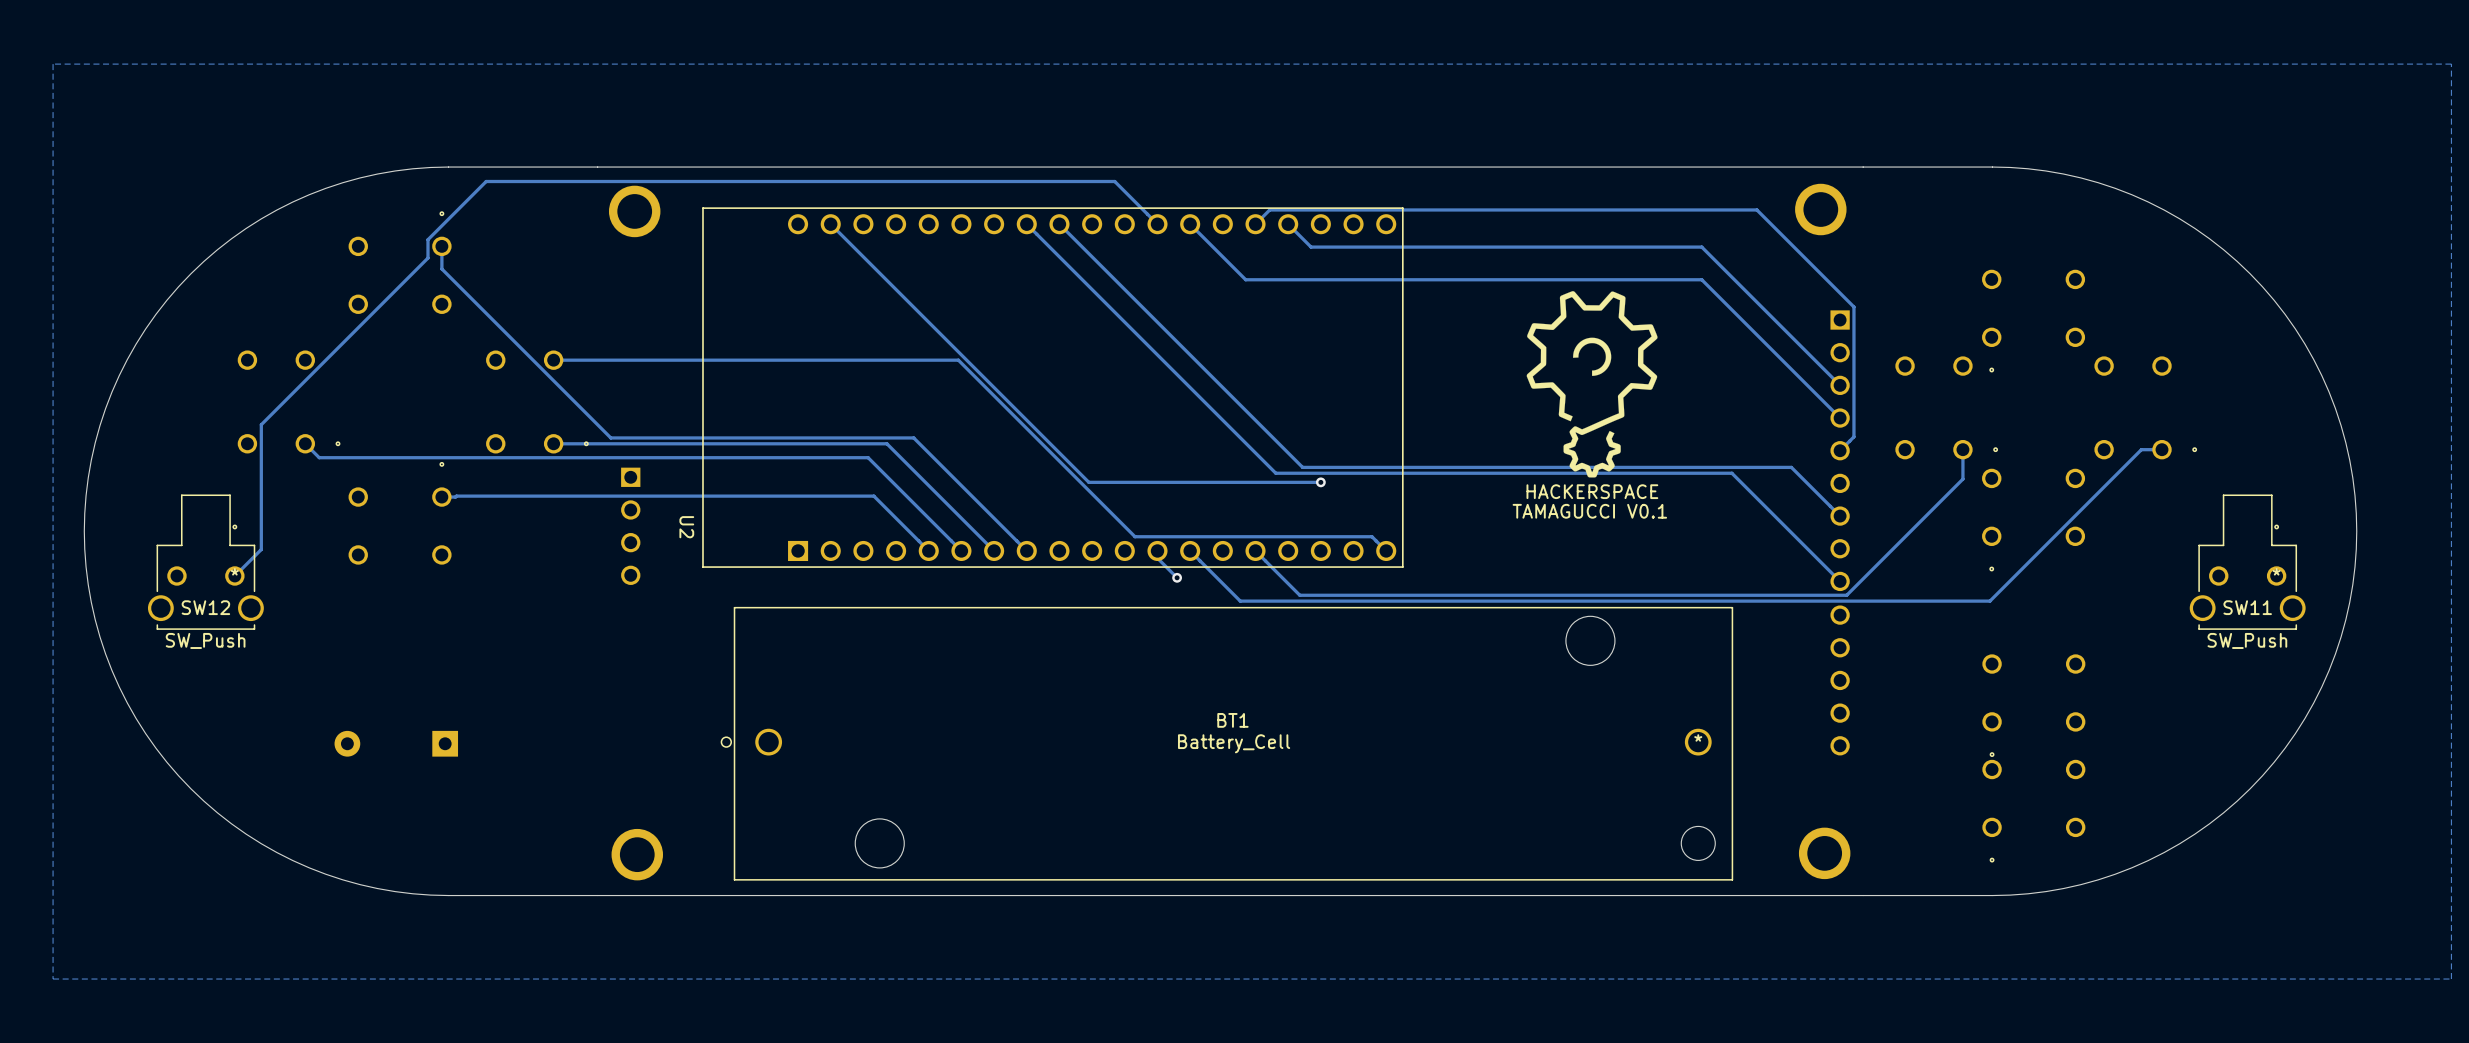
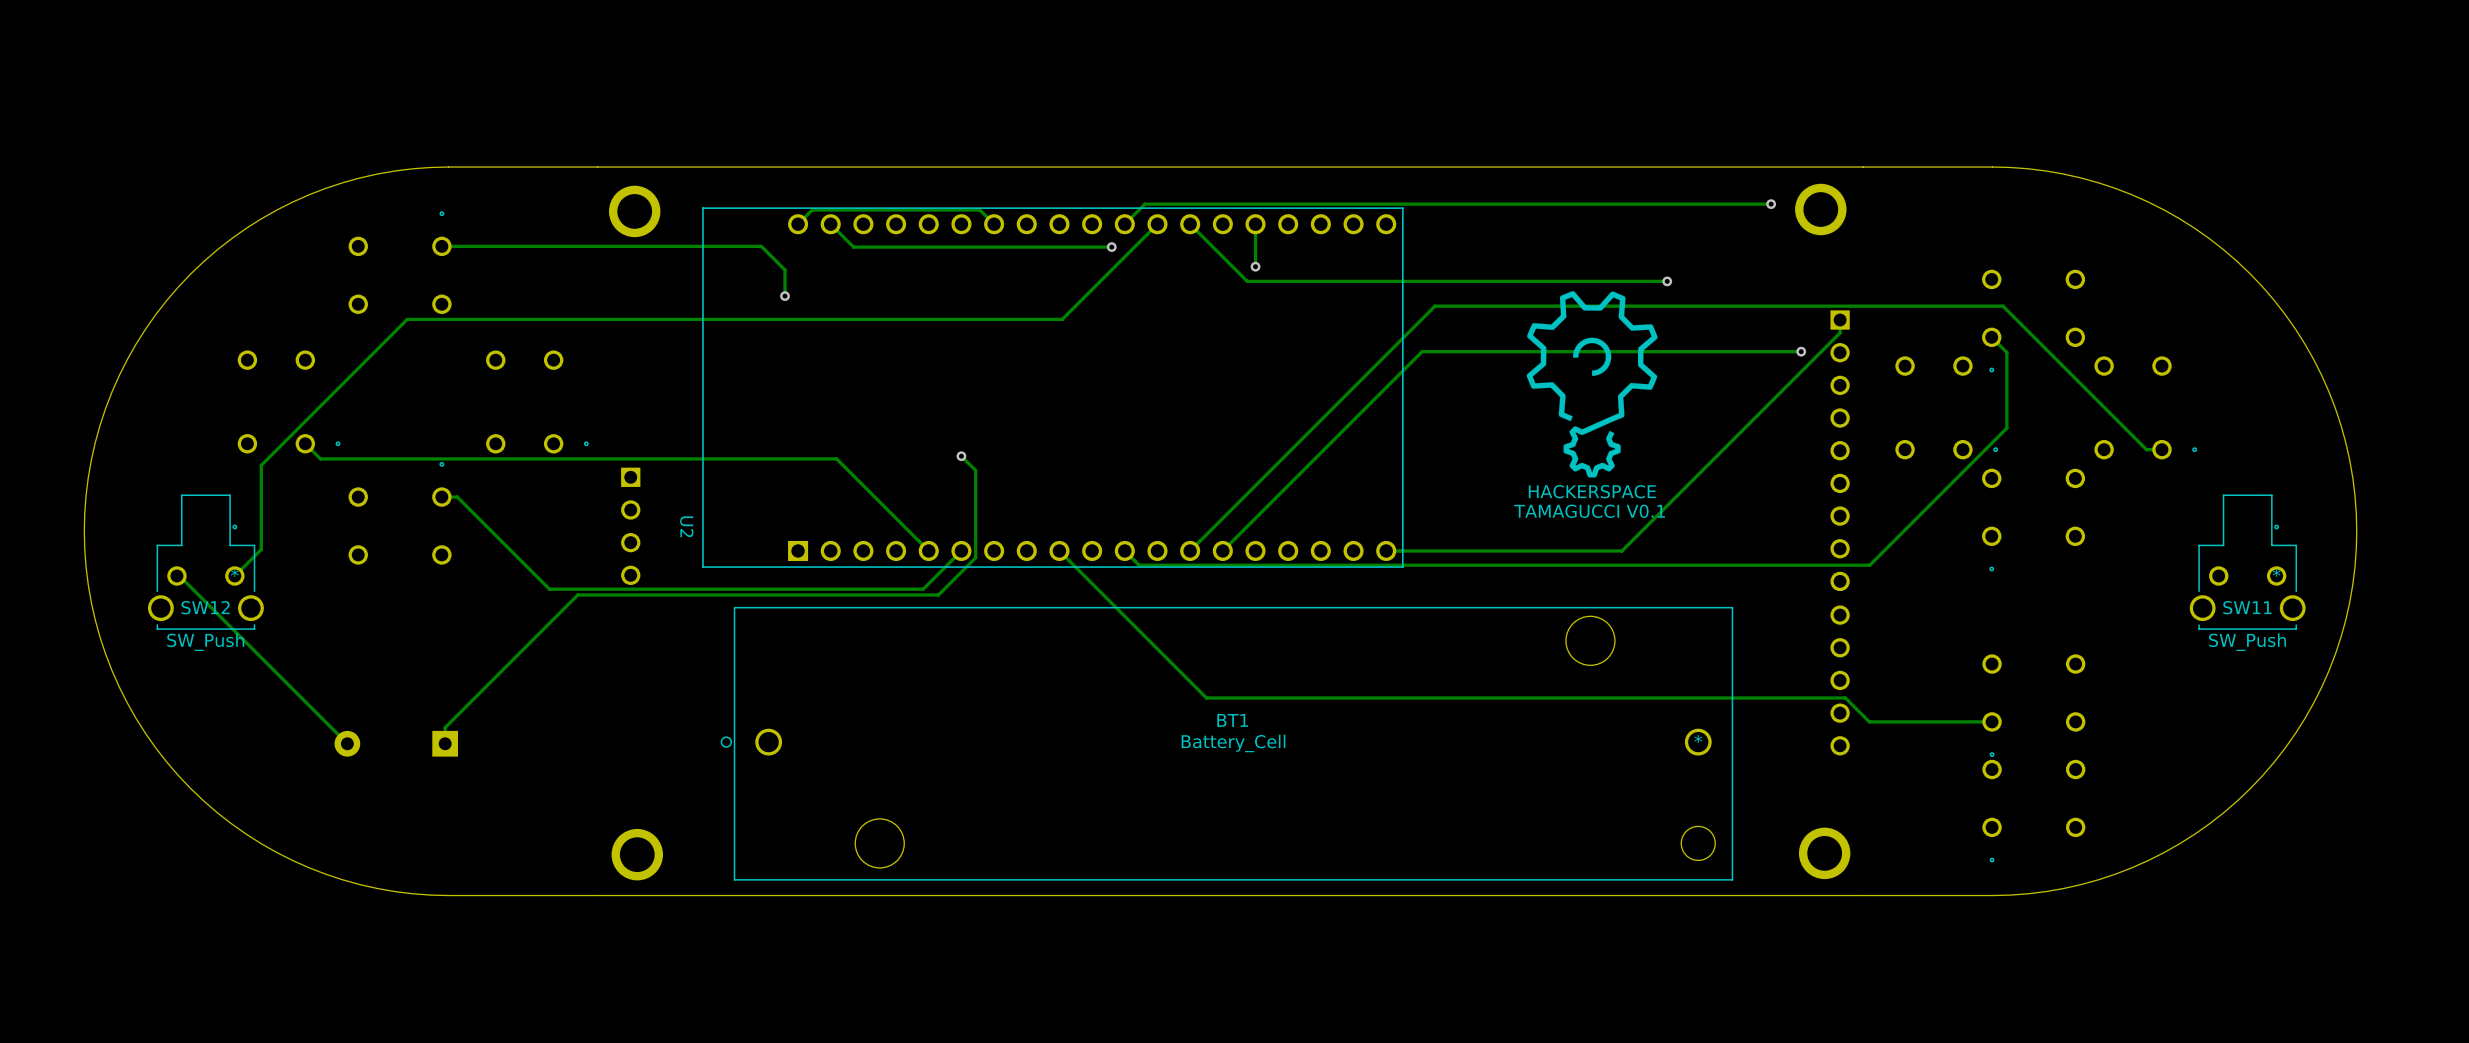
zone outline: (2451, 64) (2451, 979) (53, 979) (53, 64) (2451, 64) -> none
track: none -> (1771, 204) (1144, 204) (1124, 224)
via: none -> (1771, 204)
track: none -> (994, 224) (979, 209) (812, 209) (798, 224)
track: (1026, 224) (1275, 473) (1731, 473) (1840, 581) -> none
track: (1059, 224) (1302, 467) (1791, 467) (1840, 516) -> none
track: (1157, 224) (1114, 181) (486, 181) (427, 239) (427, 258) (261, 424) (261, 465) -> (1157, 224) (1062, 319) (407, 319) (261, 465)
track: (1255, 224) (1269, 209) (1756, 209) (1853, 307) (1853, 436) (1840, 450) -> (1255, 224) (1255, 266)
track: (1288, 224) (1311, 247) (1701, 247) (1840, 385) -> none
track: (441, 246) (441, 269) (610, 437) (913, 437) (1026, 550) -> (441, 246) (761, 246) (784, 269) (784, 296)
track: (853, 247) (1088, 482) (1320, 482) -> (853, 247) (1111, 247)
via: none -> (1111, 247)
via: none -> (1255, 266)
track: (1245, 279) (1701, 279) (1840, 418) -> (1245, 279) (1247, 281) (1667, 281)
via: none -> (1667, 281)
via: none -> (784, 296)
track: none -> (1991, 337) (2006, 352) (2006, 428) (1869, 565) (1139, 565) (1124, 550)
track: none -> (1801, 351) (1422, 351) (1222, 550)
via: none -> (1801, 351)
track: (553, 360) (958, 360) (1134, 536) (1371, 536) (1386, 550) -> (1840, 320) (1840, 332) (1622, 550) (1386, 550)
track: (553, 443) (886, 443) (994, 550) -> none
track: (1962, 449) (1962, 479) (1846, 595) (1299, 595) (1255, 550) -> none
track: (2146, 449) (2141, 449) (1989, 601) (1240, 601) (1190, 550) -> (2146, 449) (2003, 306) (1434, 306) (1190, 550)
track: none -> (961, 456) (975, 470) (975, 557) (938, 595) (577, 595) (445, 727) (445, 743)
via: none -> (961, 456)
track: (319, 457) (868, 457) (961, 550) -> (319, 457) (836, 458) (873, 496)
via: (1320, 482) -> none
track: (873, 496) (455, 497) -> (961, 550) (923, 589) (549, 589) (455, 497)
track: none -> (1059, 550) (1206, 698) (1845, 698) (1869, 721) (1992, 721)
track: (1157, 550) (1157, 558) (1177, 577) -> none
track: none -> (179, 575) (347, 743)
via: (1177, 577) -> none

